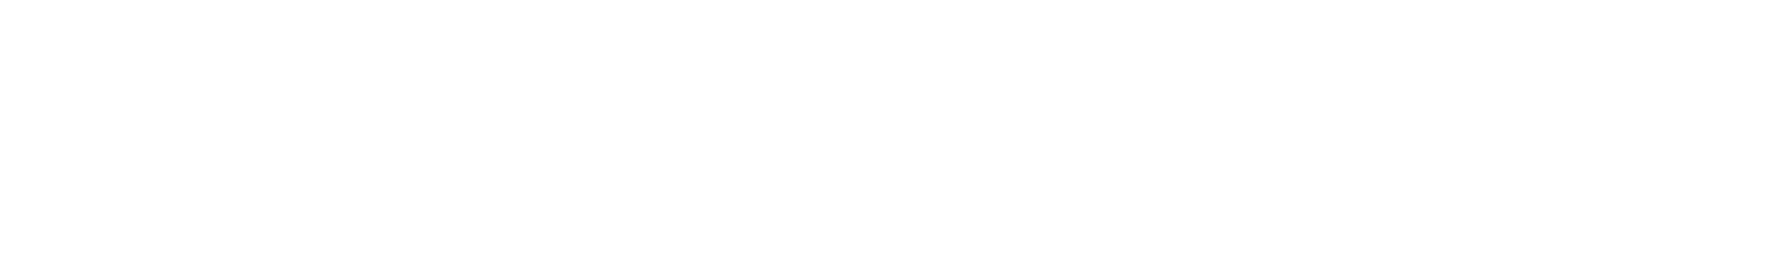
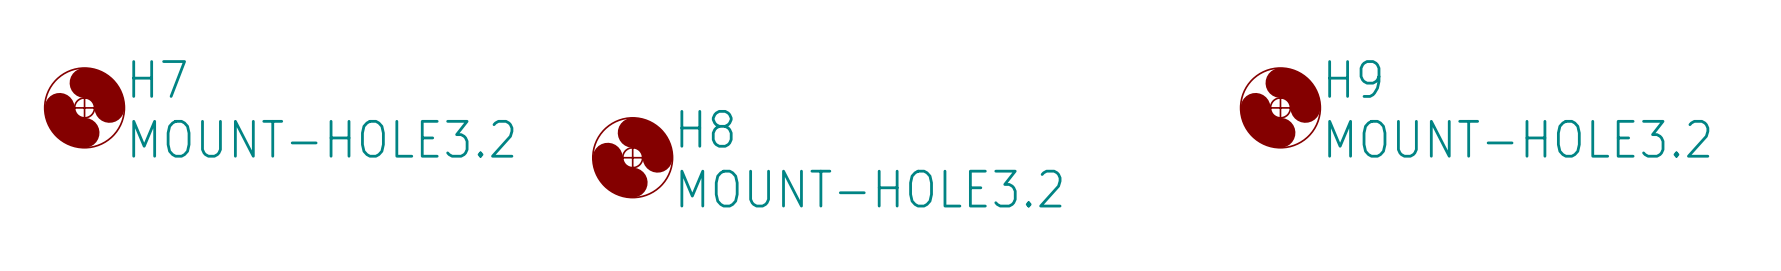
H7: none -> MOUNT-HOLE3.2 (84, 107)
H9: none -> MOUNT-HOLE3.2 (1280, 107)
H8: none -> MOUNT-HOLE3.2 (632, 157)

